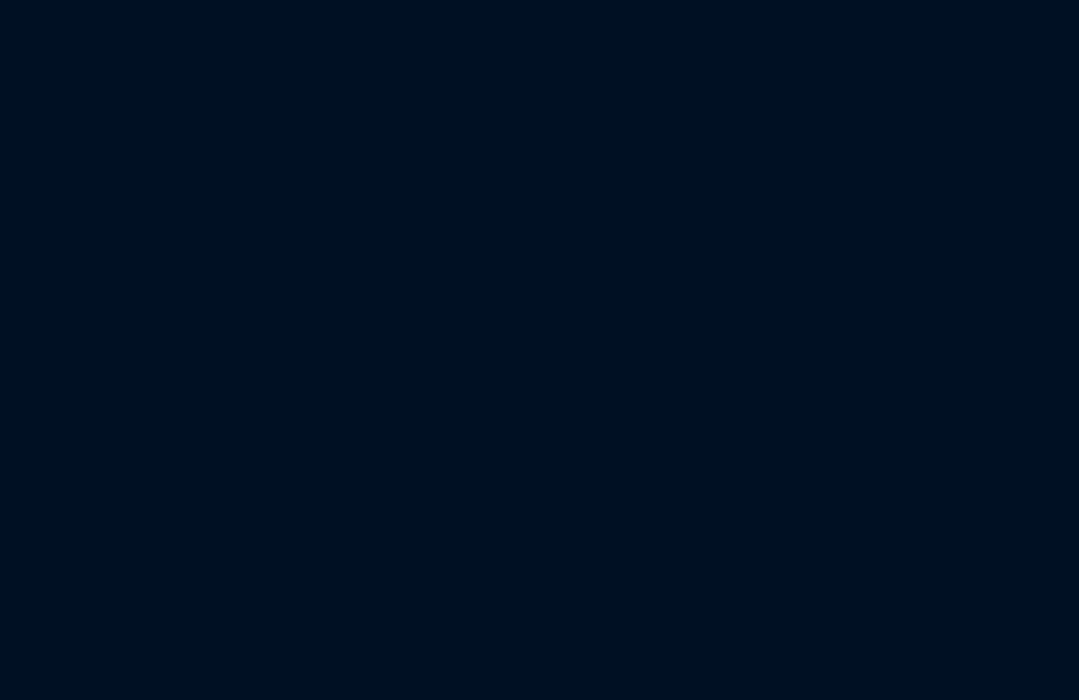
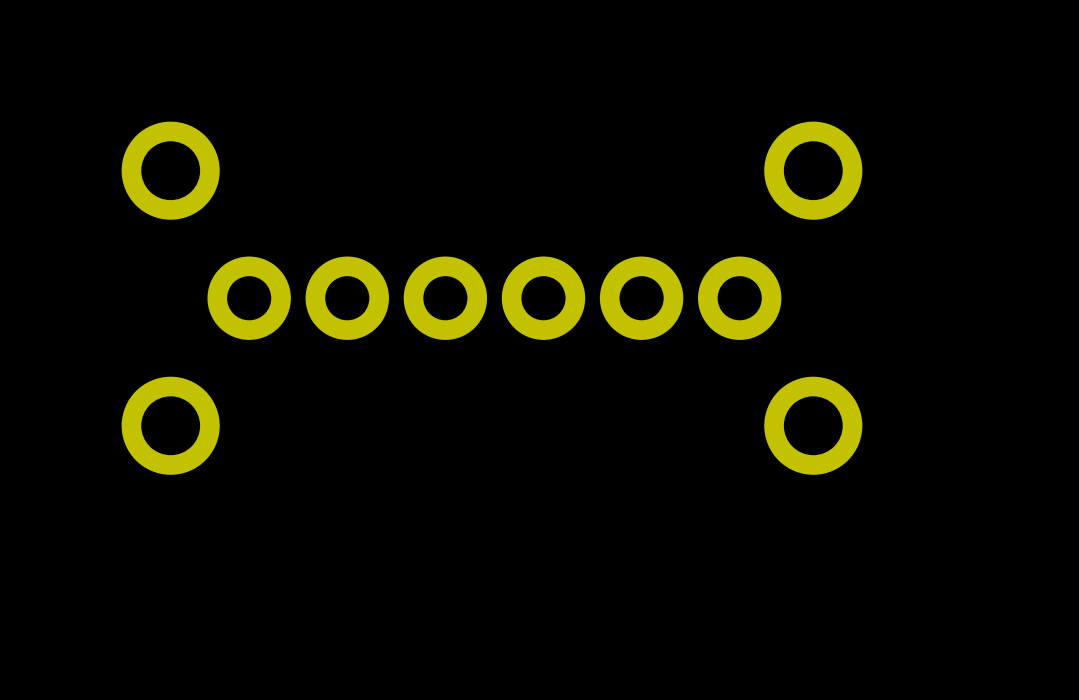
part: none -> (491, 298)

